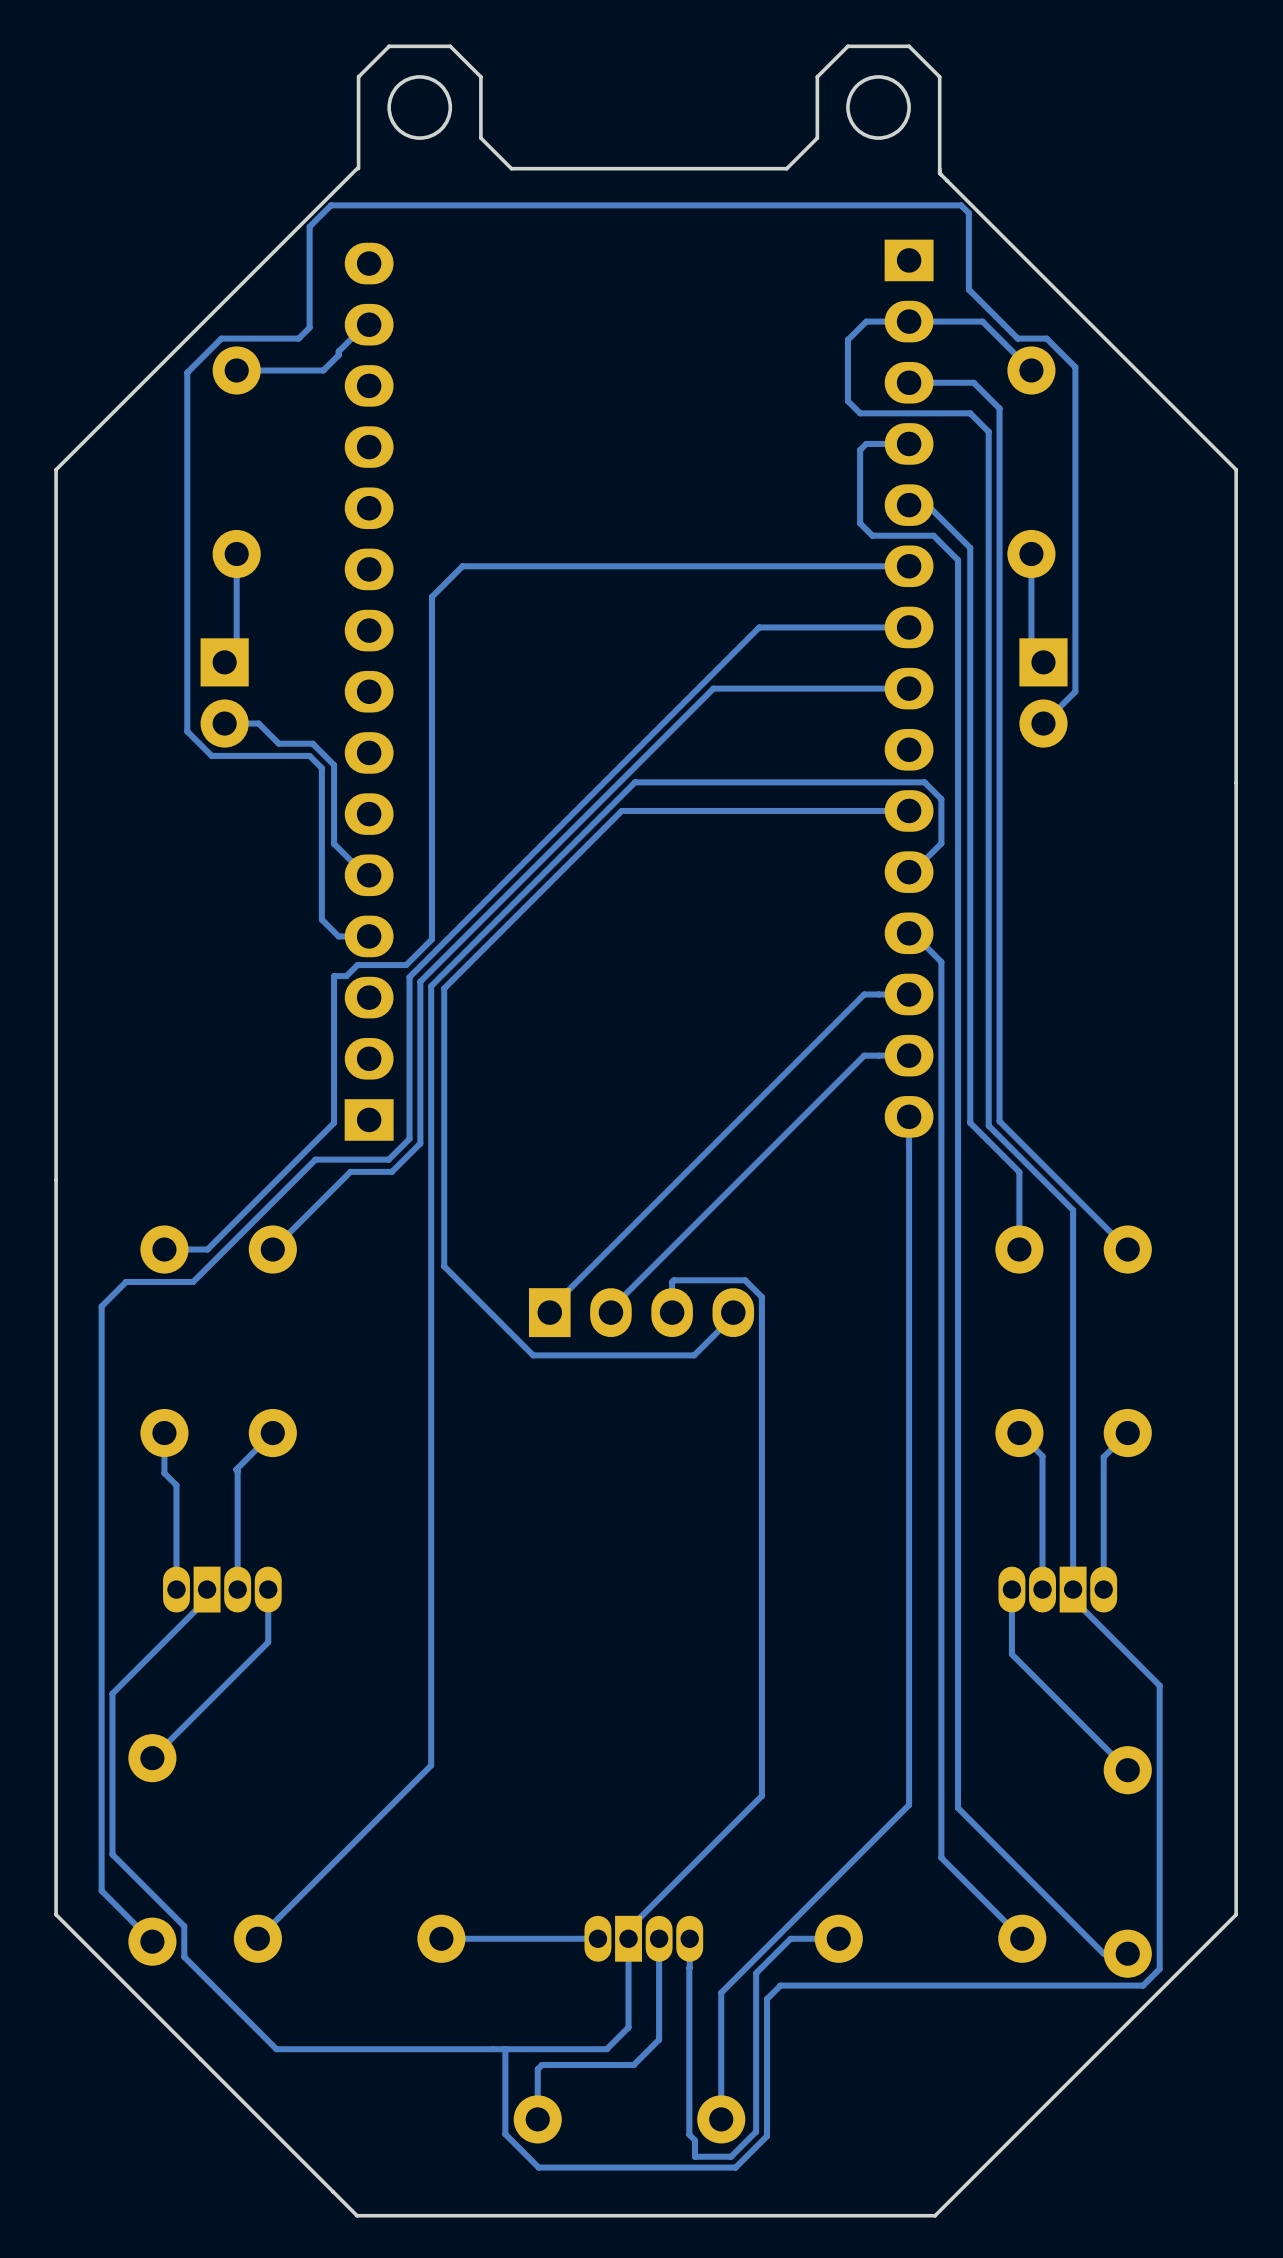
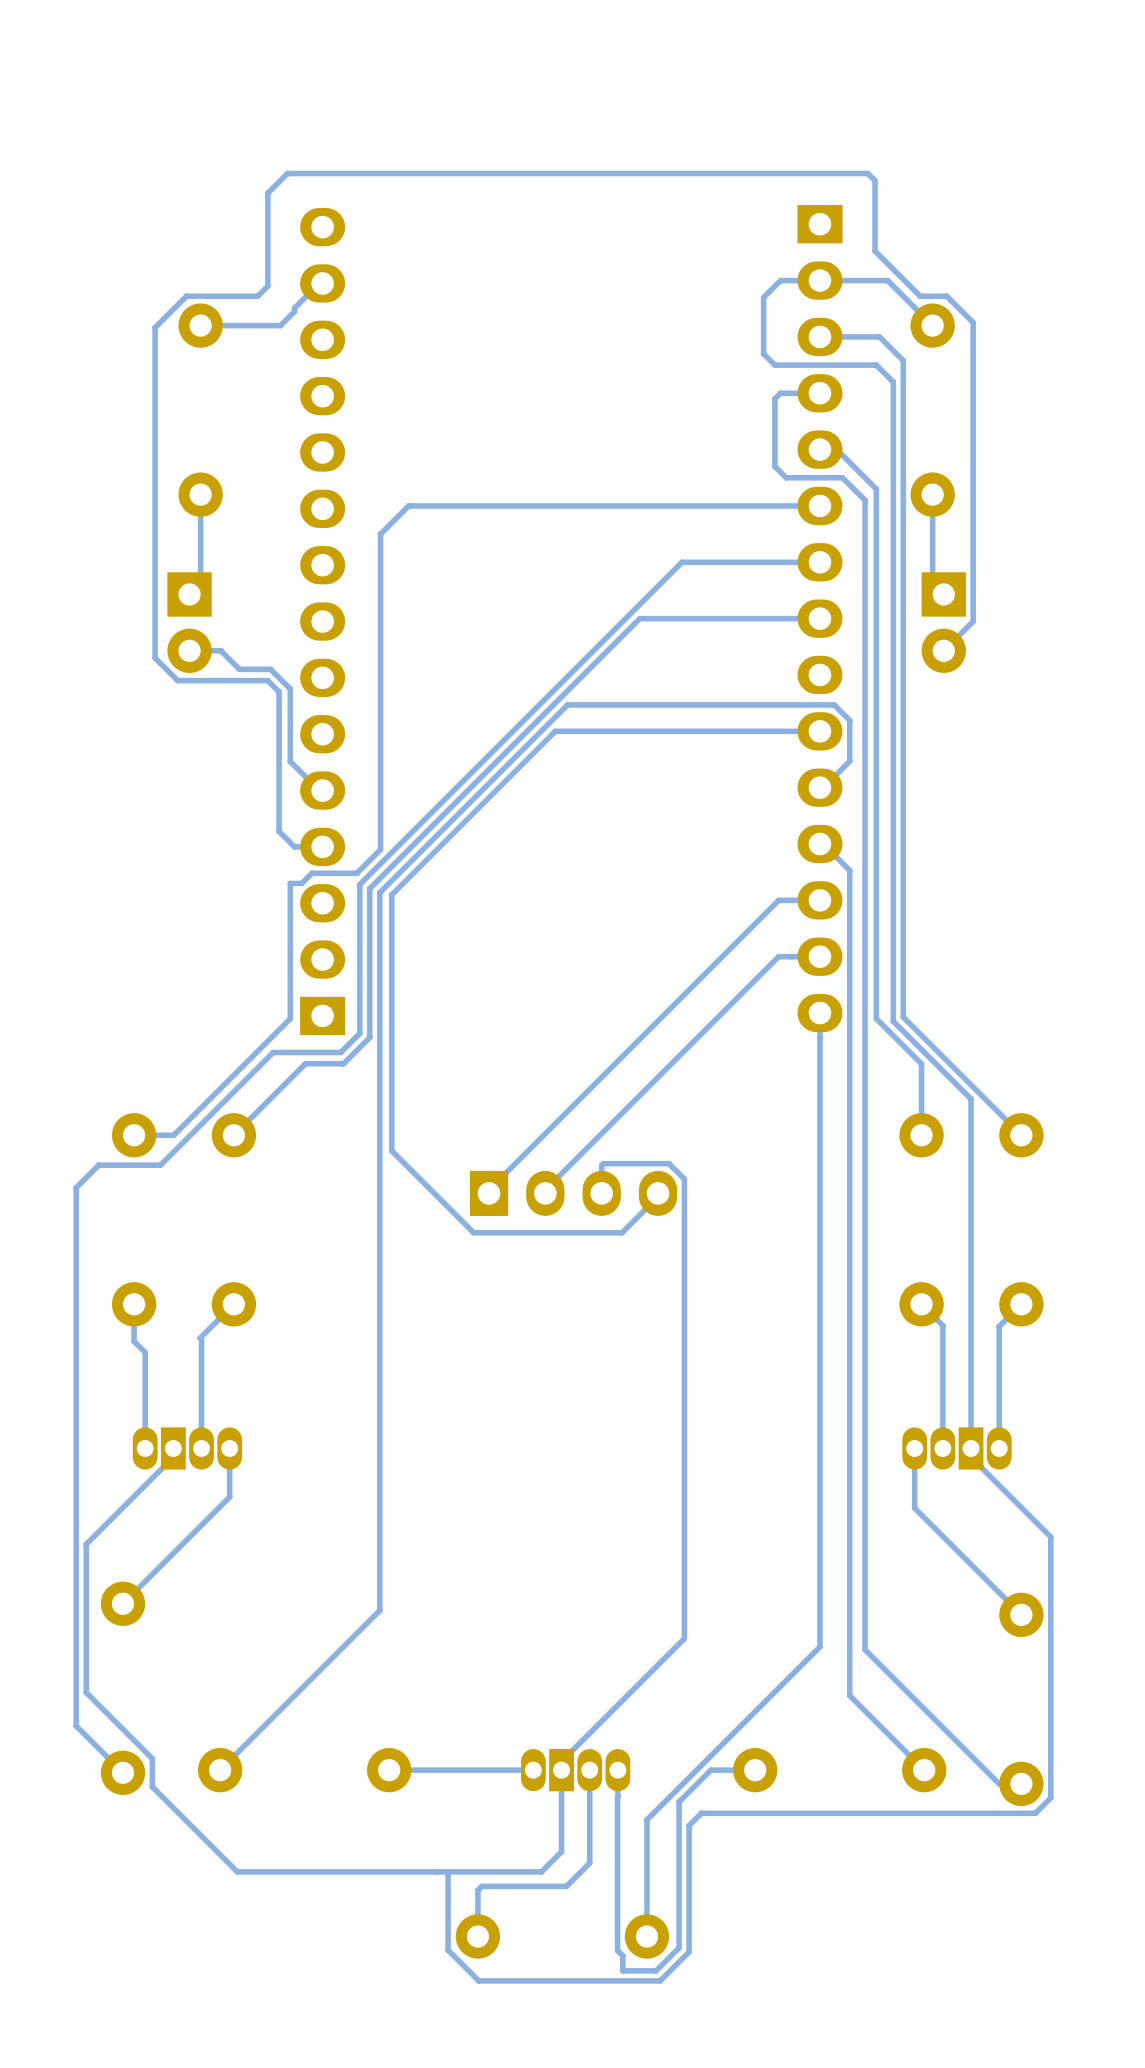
round board edge: [387, 75, 453, 140] -> none
round board edge: [846, 75, 911, 140] -> none
board edge: (357, 168) (56, 469) (56, 1914) (357, 2215) (935, 2215) (1236, 1914) (1236, 469) (939, 173) -> none
board edge: (358, 168) (358, 76) (389, 46) (450, 46) (480, 76) (480, 138) (511, 168) (786, 168) (817, 138) (817, 76) (847, 46) (909, 46) (939, 76) (939, 173) -> none

